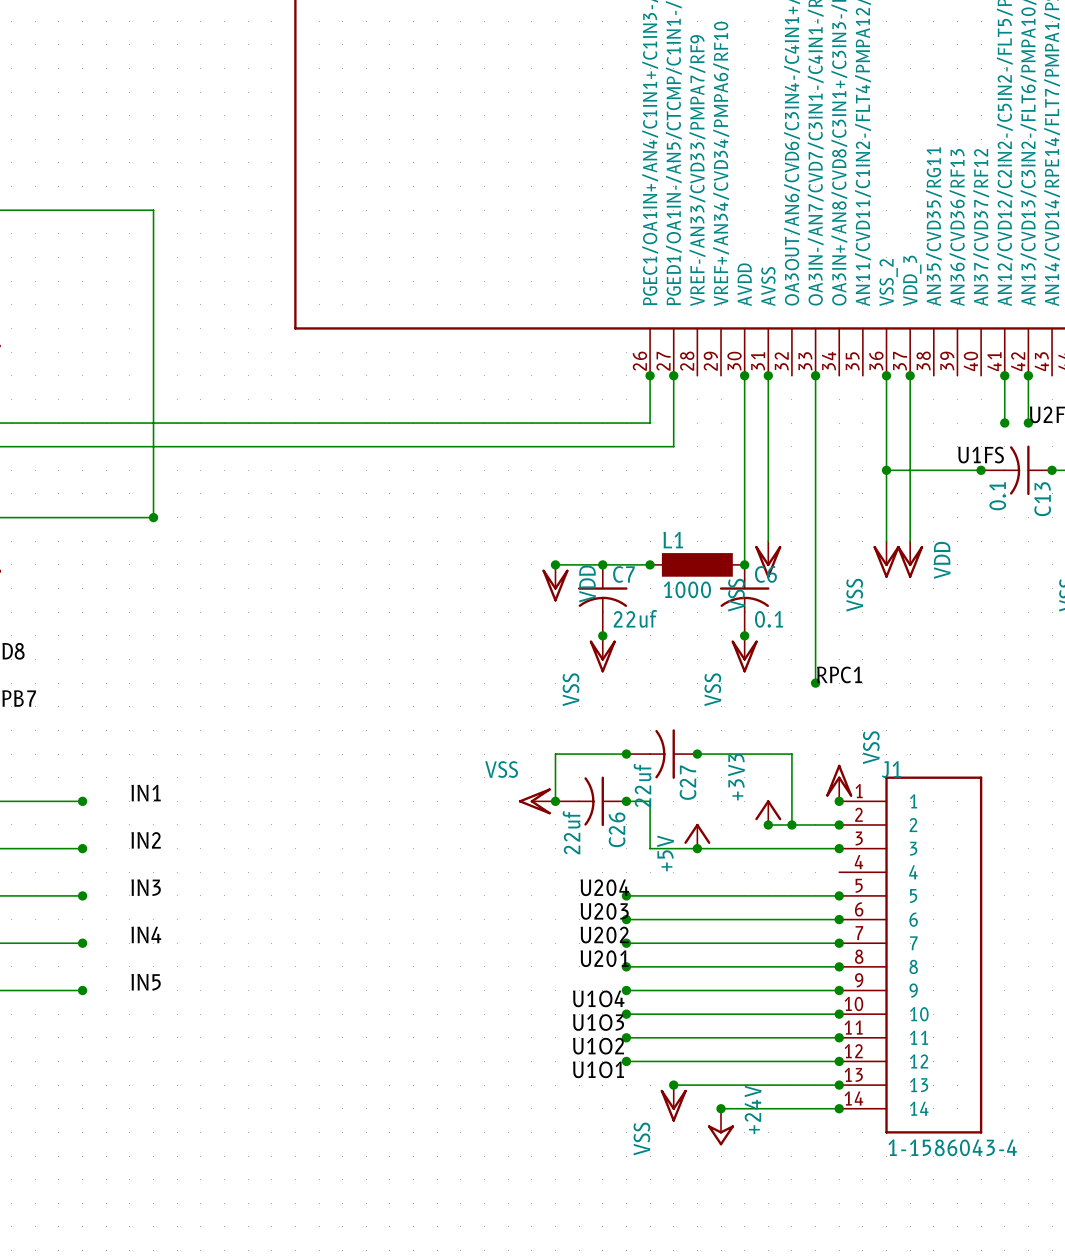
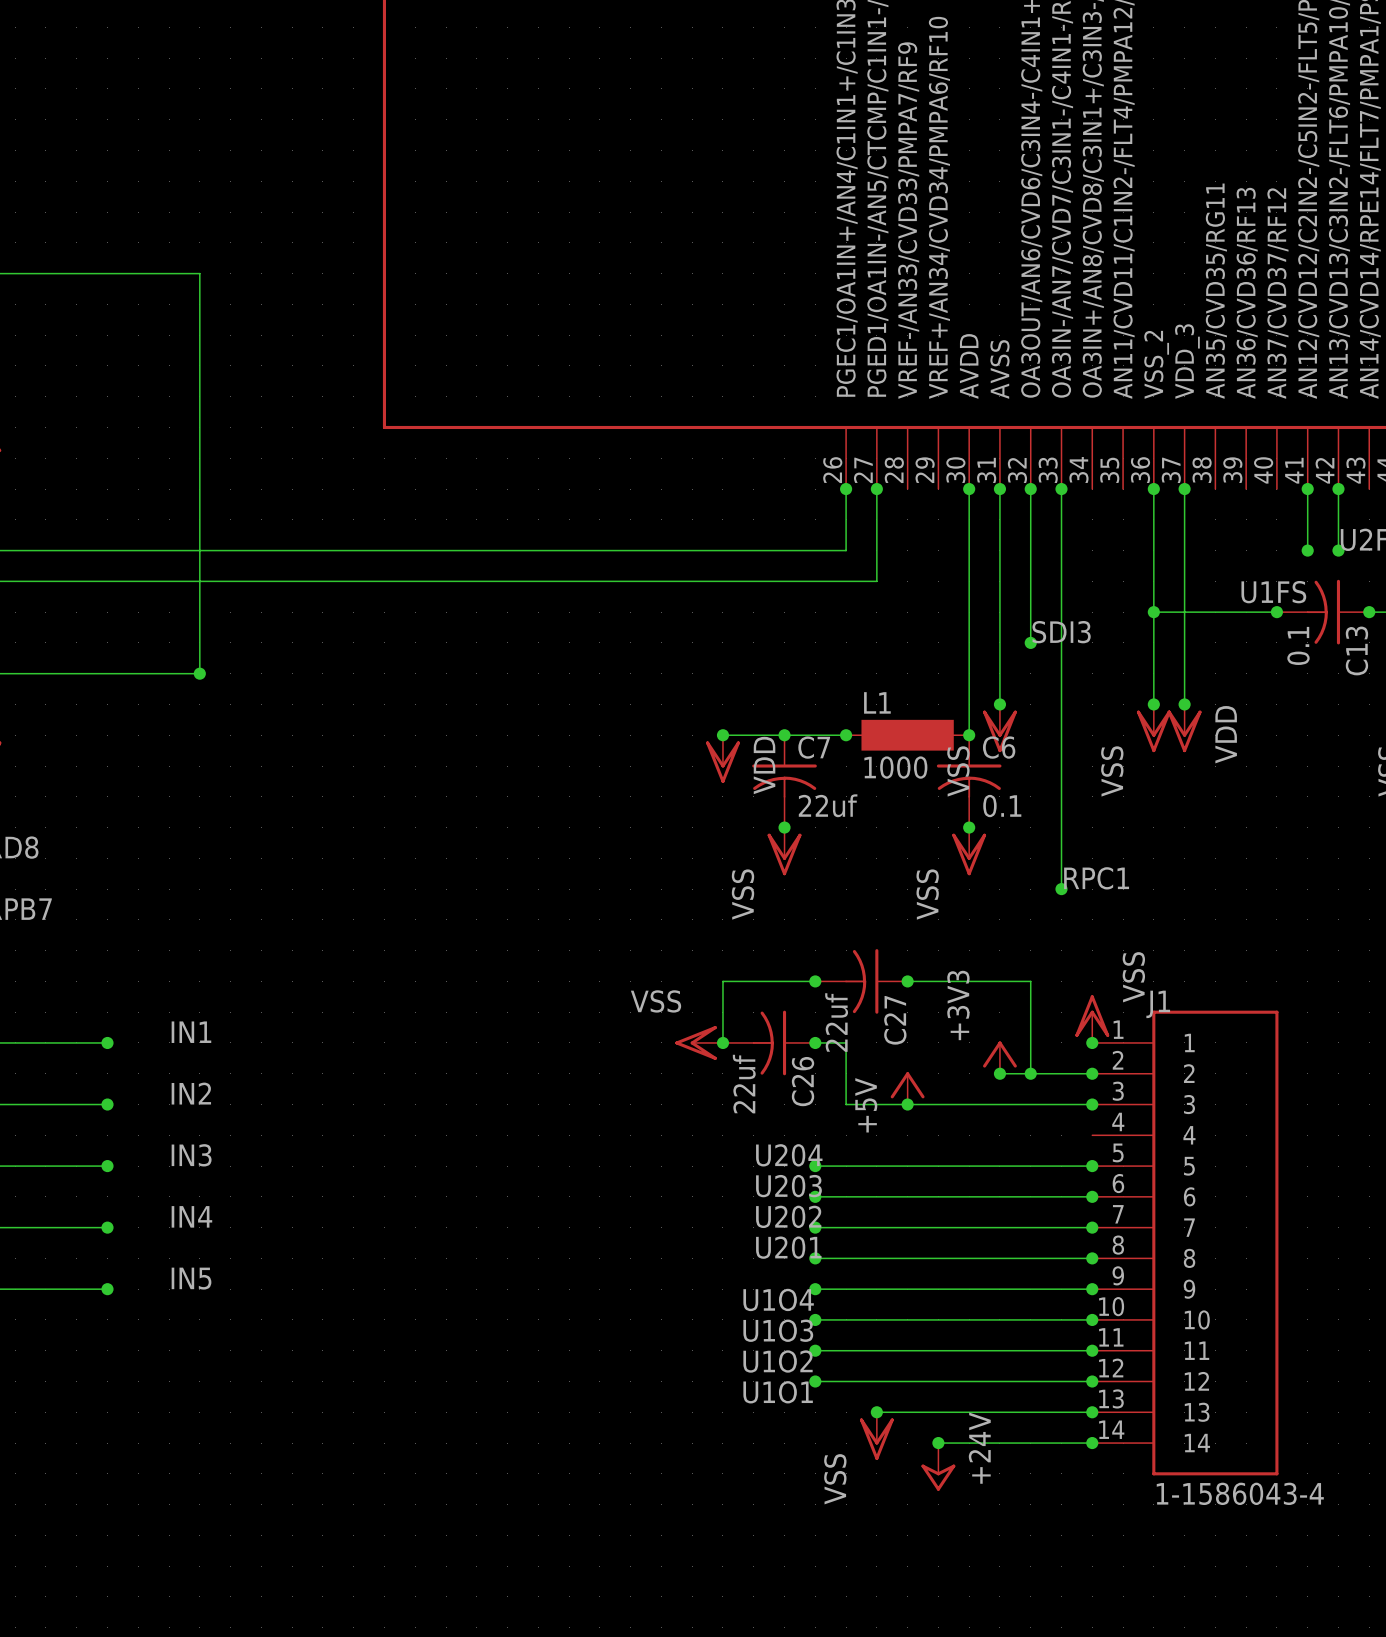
wire: none -> (1030, 489) (1030, 642)
junction: none -> (1030, 489)
label: none -> SDI3 (1061, 632)
junction: none -> (1030, 642)
junction: none -> (999, 704)
junction: none -> (1153, 704)
junction: none -> (1184, 704)

